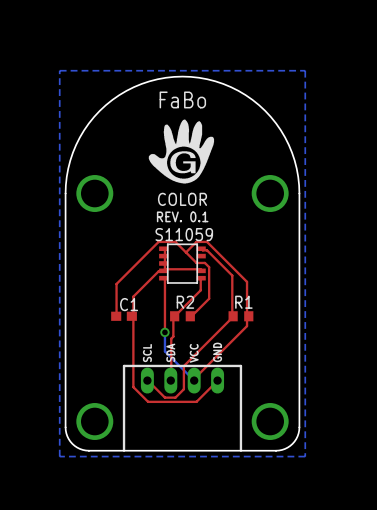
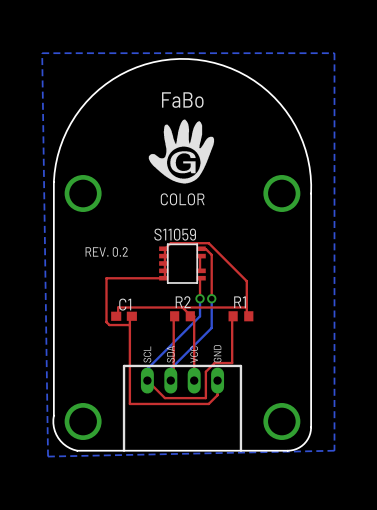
bottom zone outline: (59, 70) (305, 70) (305, 456) (59, 456) (59, 70) -> (42, 53) (48, 456) (334, 450) (334, 53) (42, 53)
part footprint: [64, 76, 300, 452] -> [52, 58, 312, 452]
text: REV. 0.1 (182, 216) -> none
top track: none -> (163, 248) (170, 243) (208, 243) (246, 281) (246, 316) (248, 316)
top track: (201, 248) (207, 250) (232, 275) (233, 316) (183, 366) (183, 389) (175, 397) (164, 397) (147, 380) -> (233, 316) (232, 363) (214, 363) (205, 371) (205, 398) (164, 398) (147, 380)
top track: none -> (201, 248) (205, 249) (211, 254) (211, 298)
text: none -> REV. 0.2 (106, 251)
top track: (186, 252) (196, 241) (207, 241) (247, 281) (247, 315) (248, 316) (247, 326) (194, 380) -> (190, 316) (194, 316) (194, 380)
top track: none -> (201, 256) (200, 269)
top track: none -> (164, 269) (164, 278) (106, 278) (106, 322) (109, 325) (129, 325)
top track: (201, 270) (200, 269) (164, 269) (158, 271) (133, 296) (131, 316) (133, 387) (148, 401) (196, 401) (217, 380) -> (131, 316) (129, 316) (129, 403) (208, 403) (217, 395) (217, 380)
top track: (163, 278) (164, 332) -> none
top track: (201, 278) (200, 290) (173, 317) (170, 380) -> (174, 316) (173, 380) (170, 380)
top track: none -> (201, 278) (200, 298)
bottom track: none -> (200, 298) (200, 316) (147, 368) (147, 380)
via: none -> (200, 298)
bottom track: none -> (211, 298) (211, 327) (170, 368) (170, 380)
via: none -> (211, 298)
top track: none -> (182, 307) (191, 316)
top track: (116, 316) (116, 284) (158, 241) (175, 241) (196, 262) (204, 262) (209, 267) (209, 298) (190, 316) -> (116, 316) (118, 316) (118, 307) (246, 307)
bottom track: (164, 332) (164, 351) (194, 380) -> none
via: (164, 332) -> none

